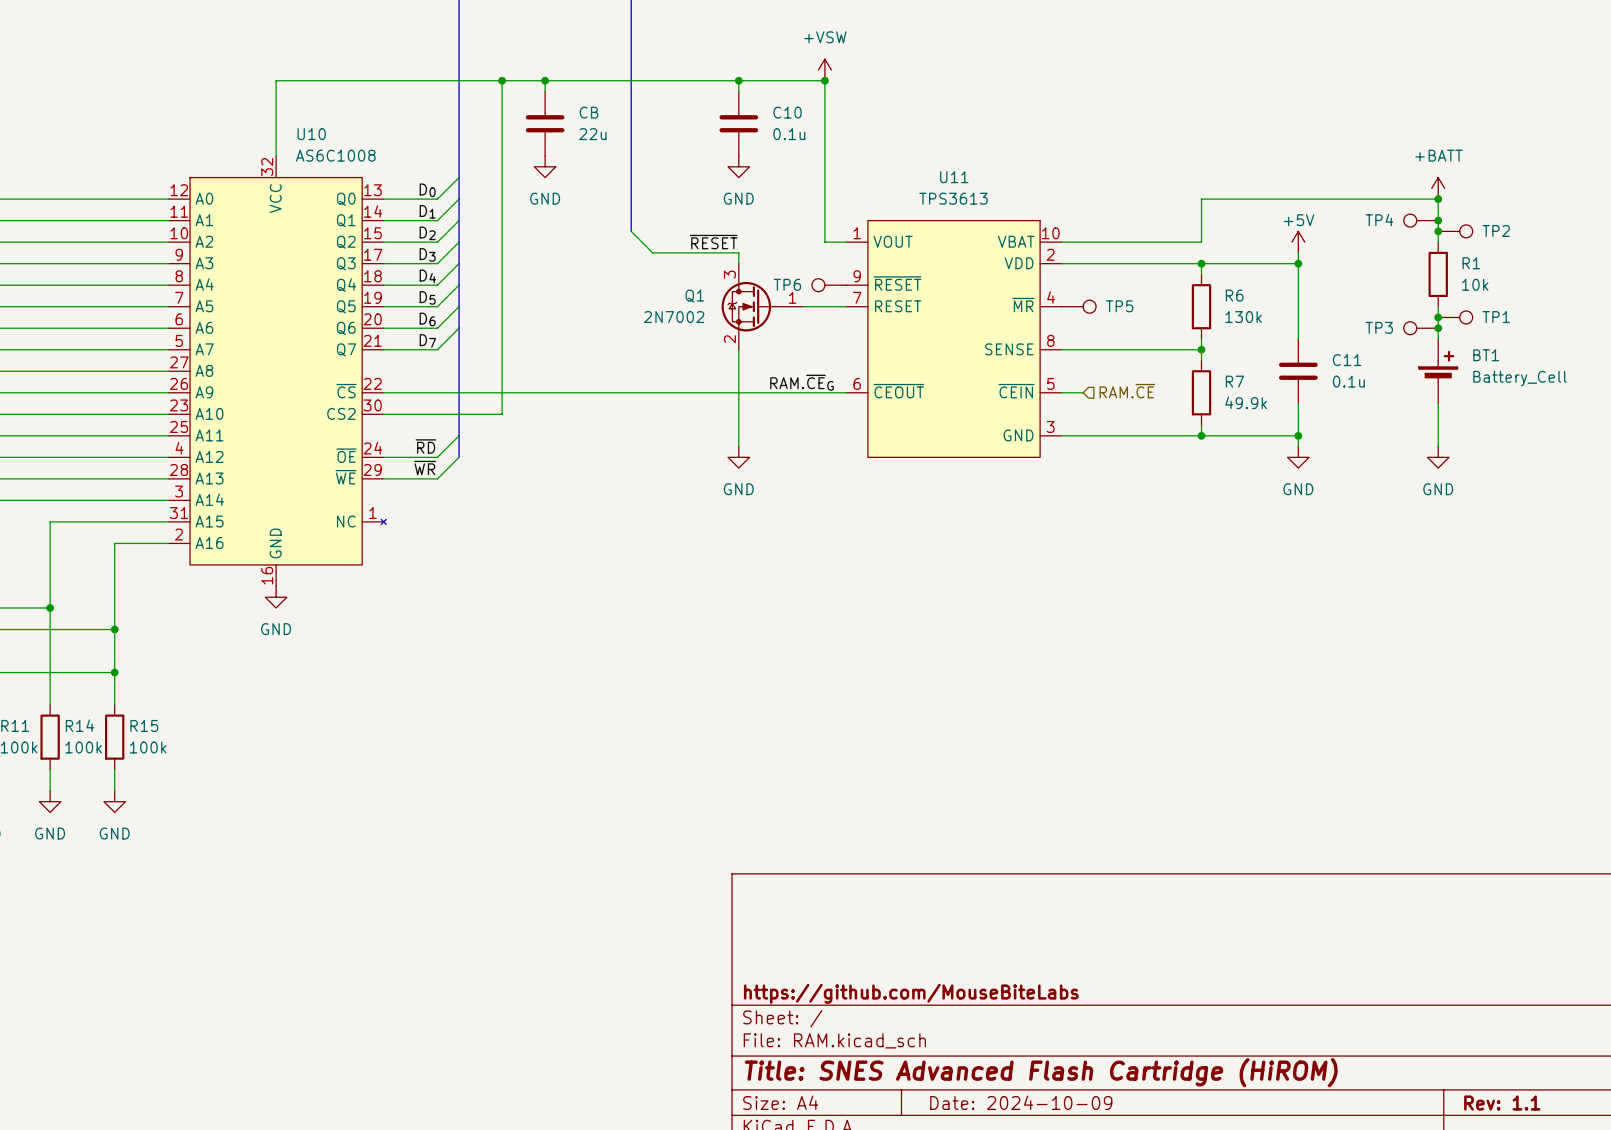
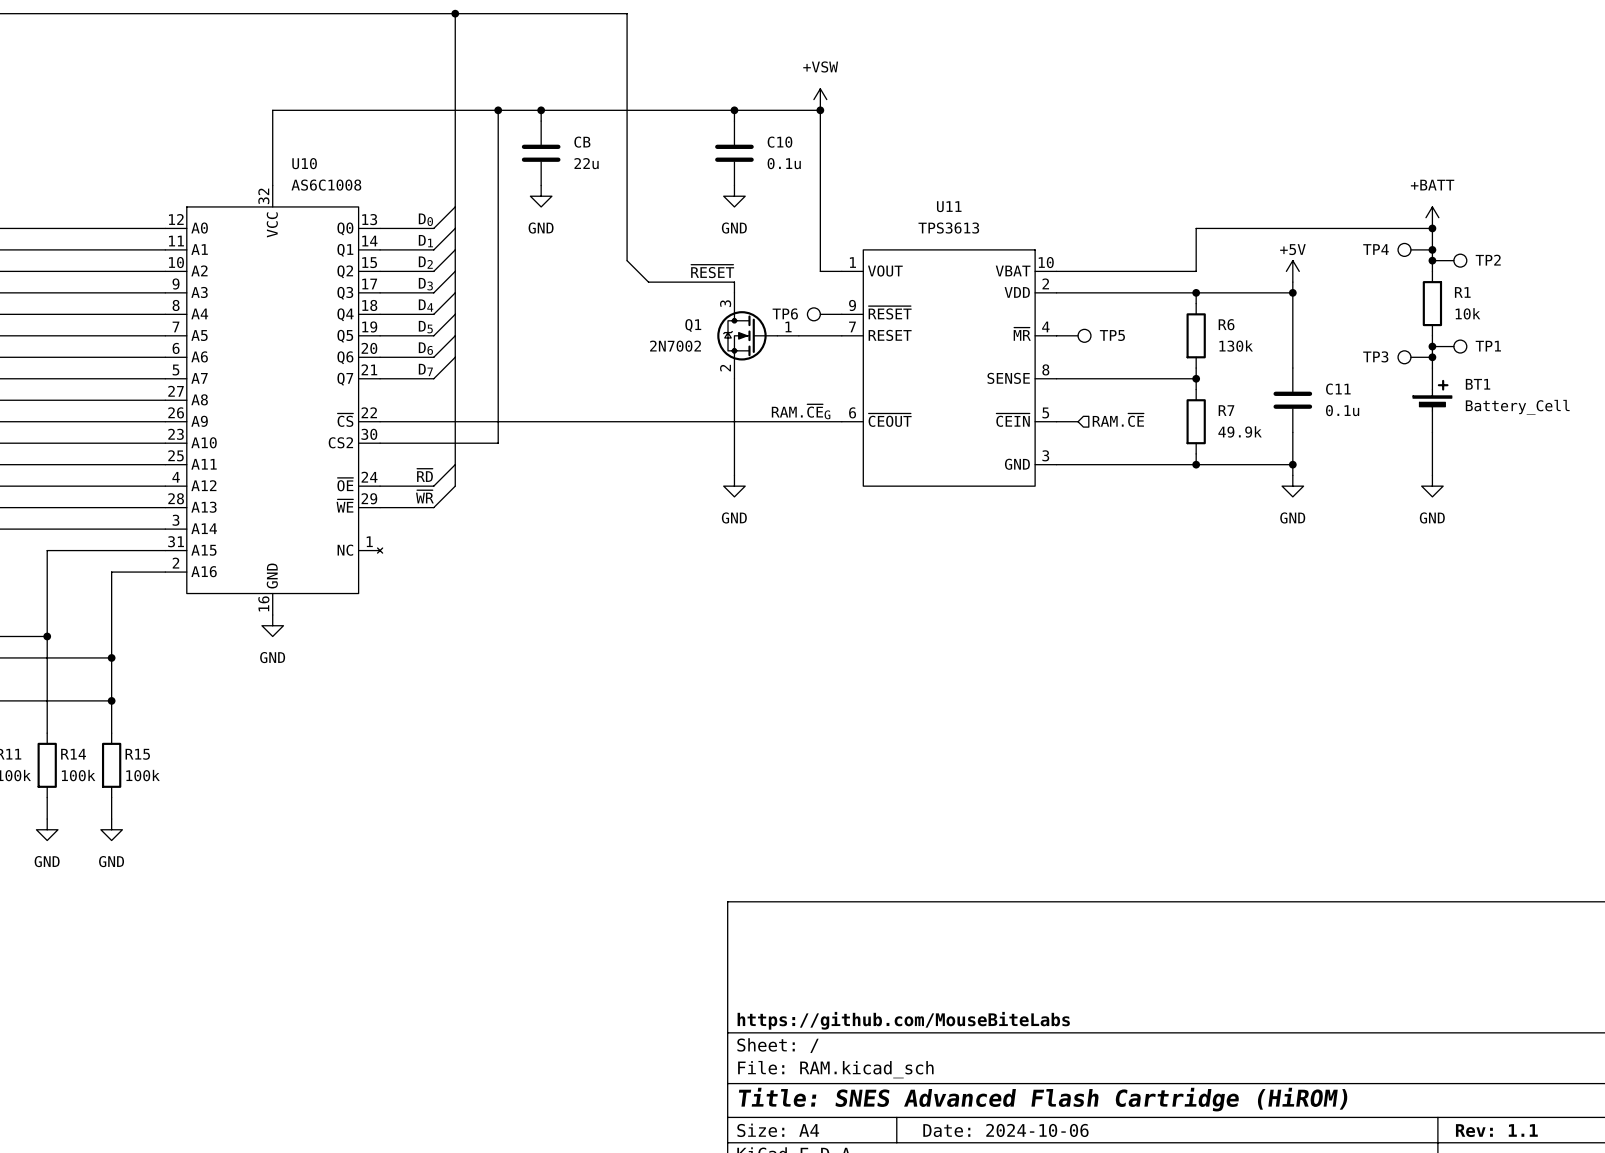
title block: Date: 2024-10-09 (1021, 1102) -> Date: 2024-10-06 (1005, 1130)

